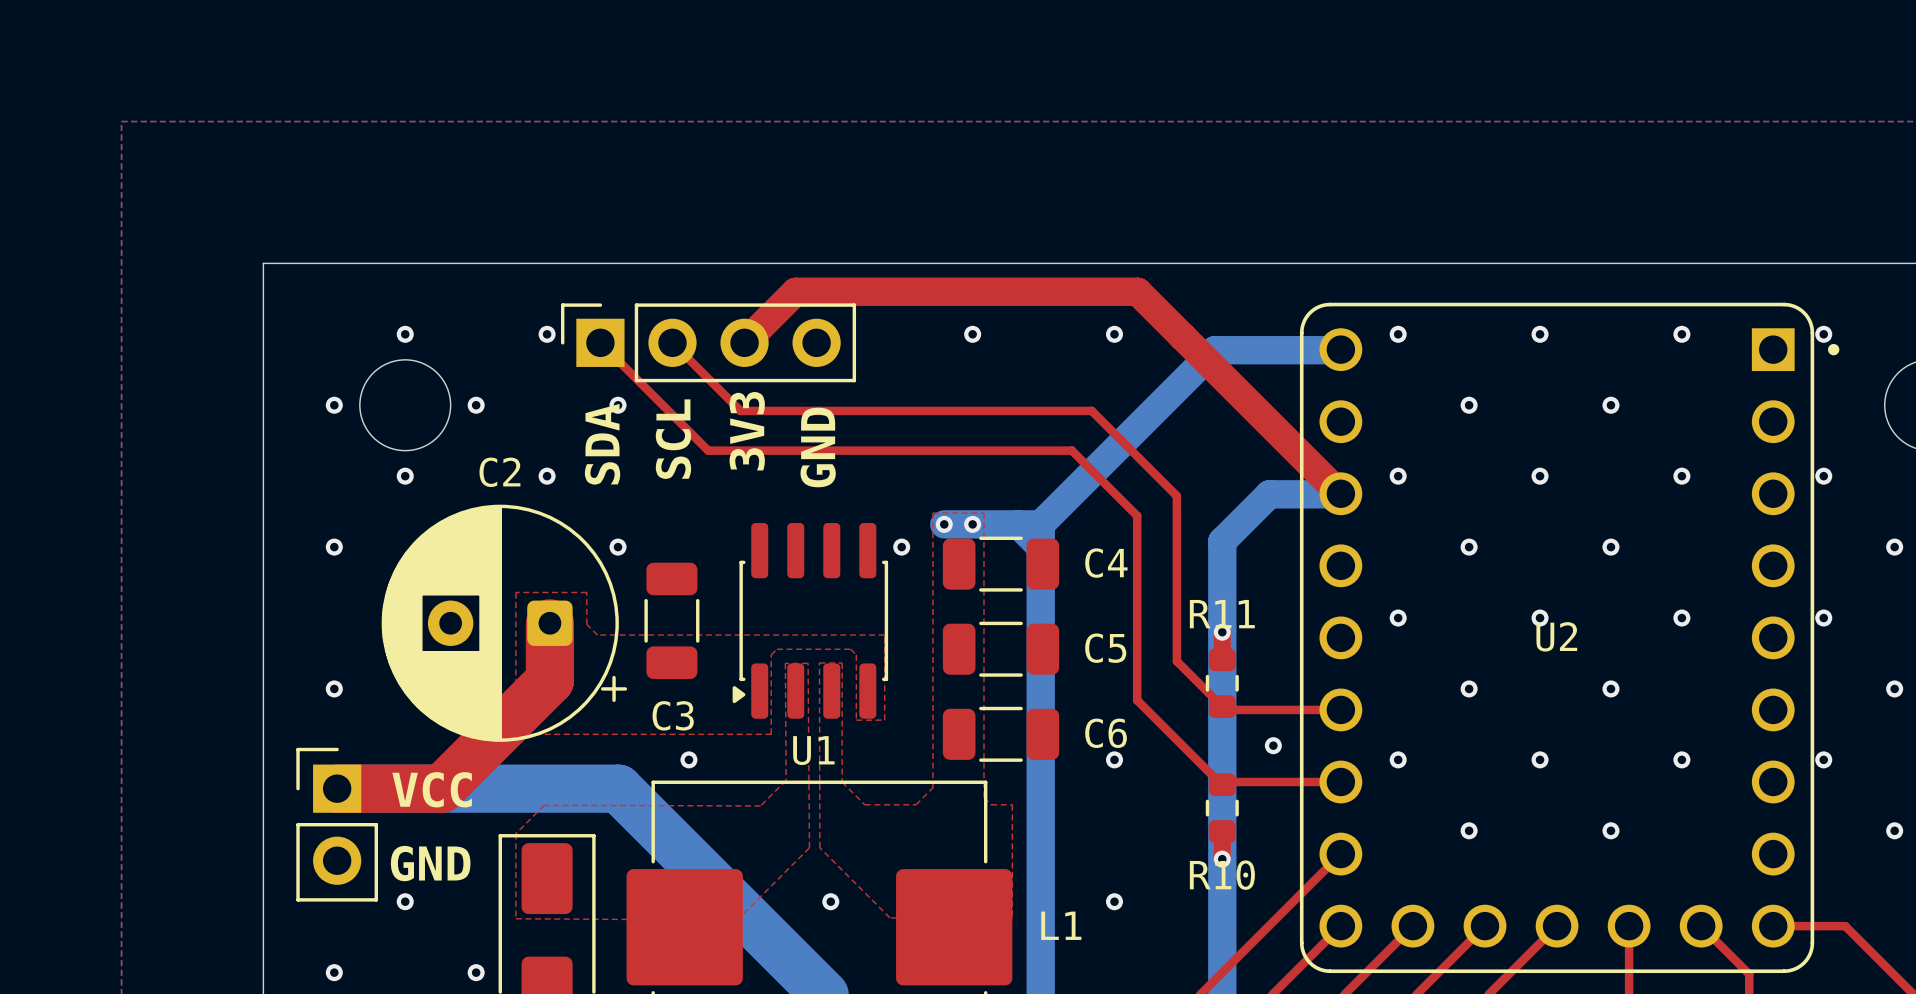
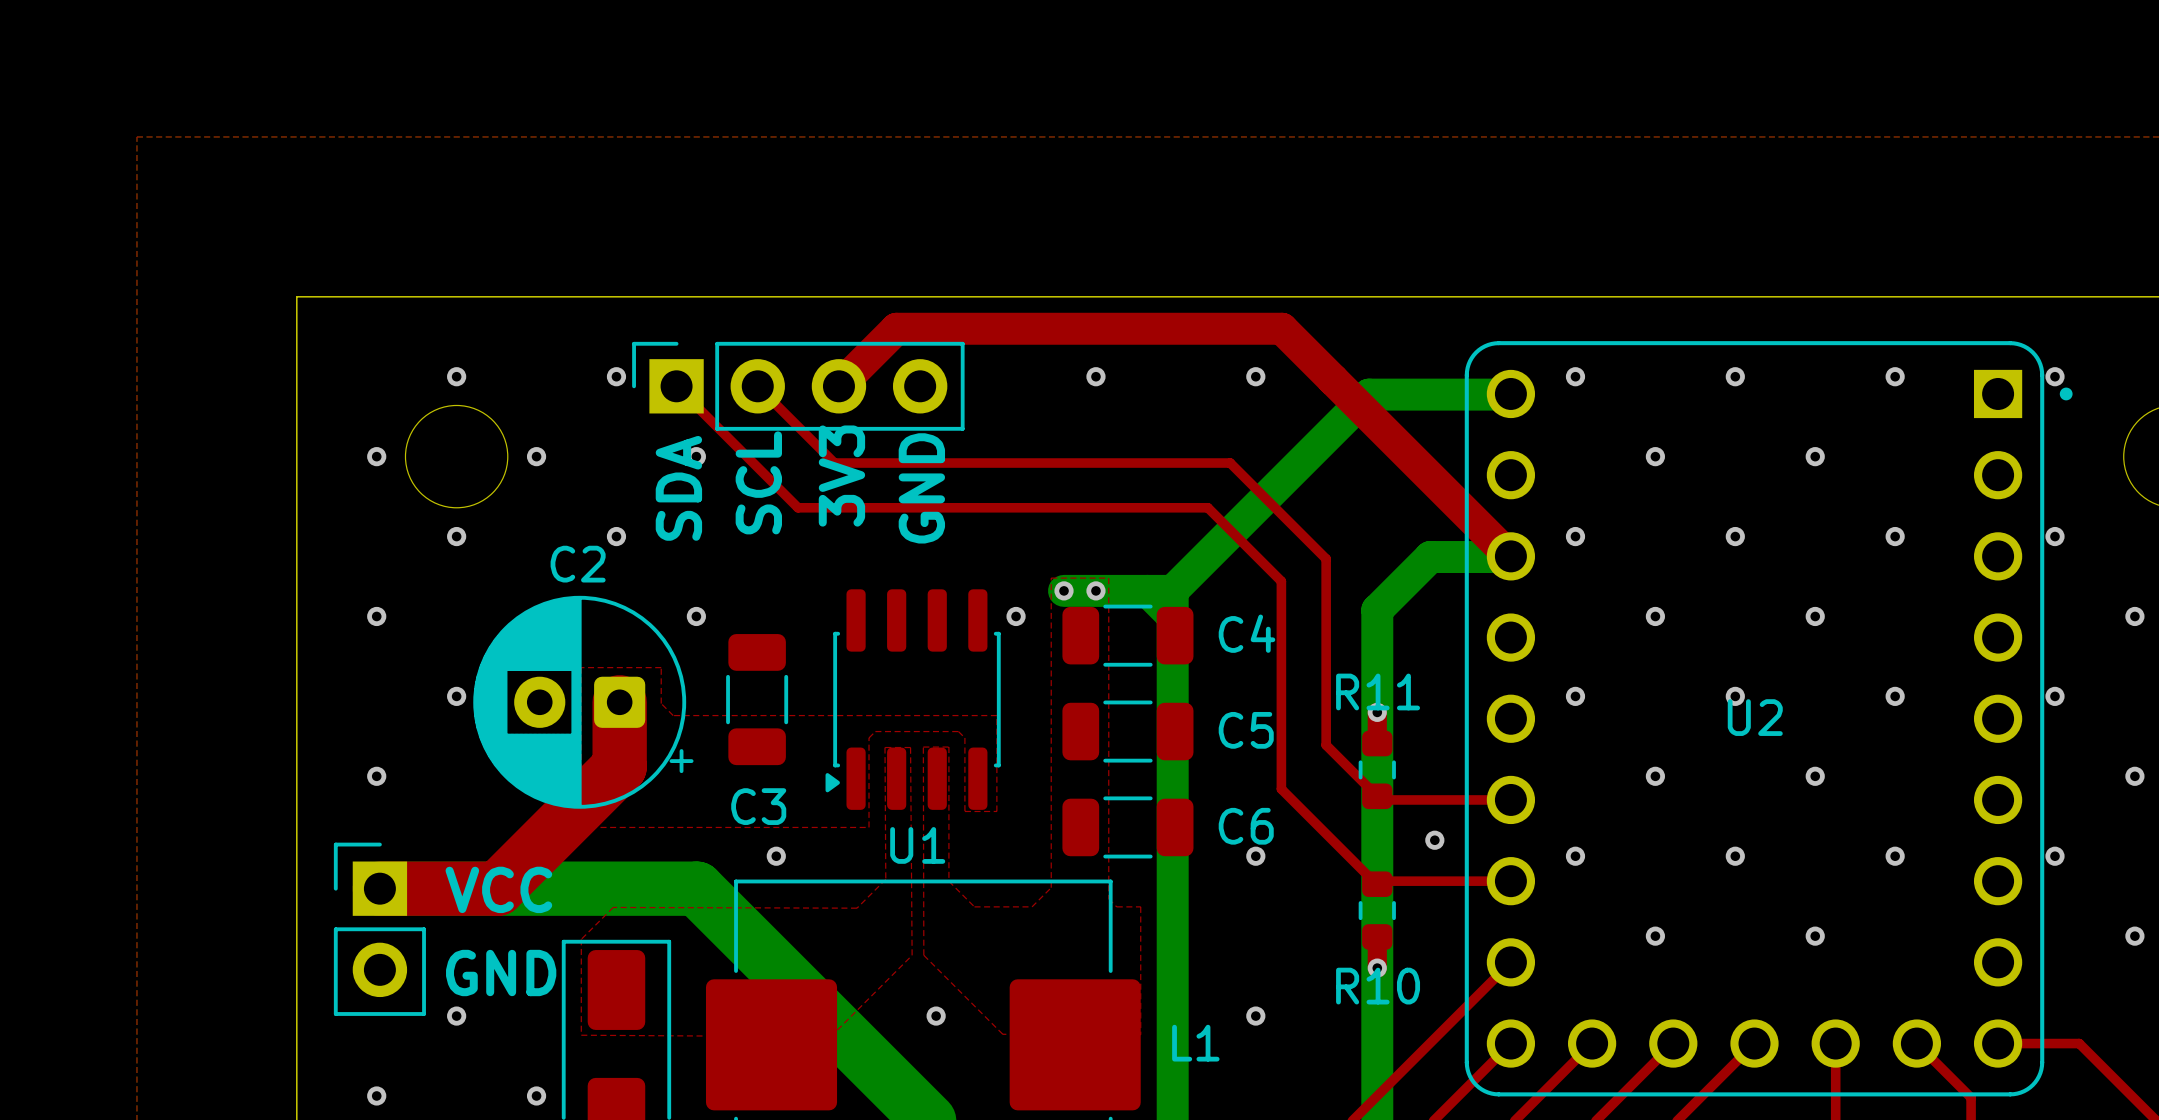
C2 footprint: [381, 504, 628, 742] -> [473, 595, 694, 809]

